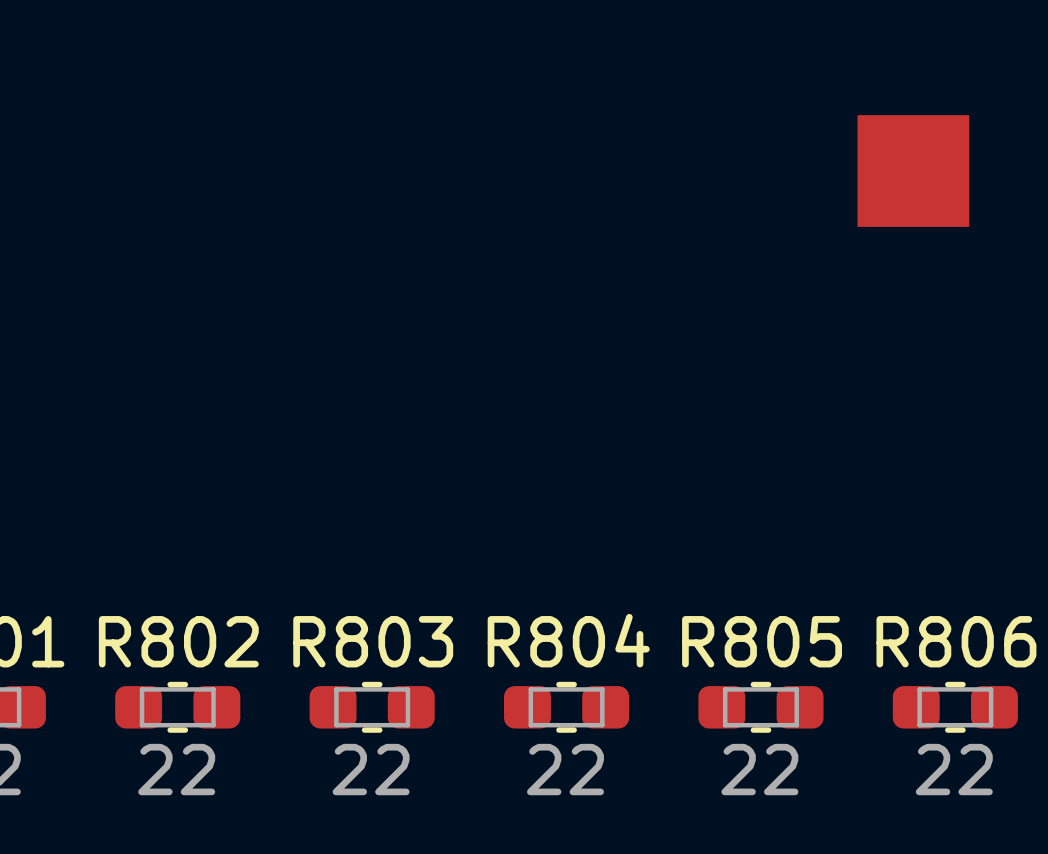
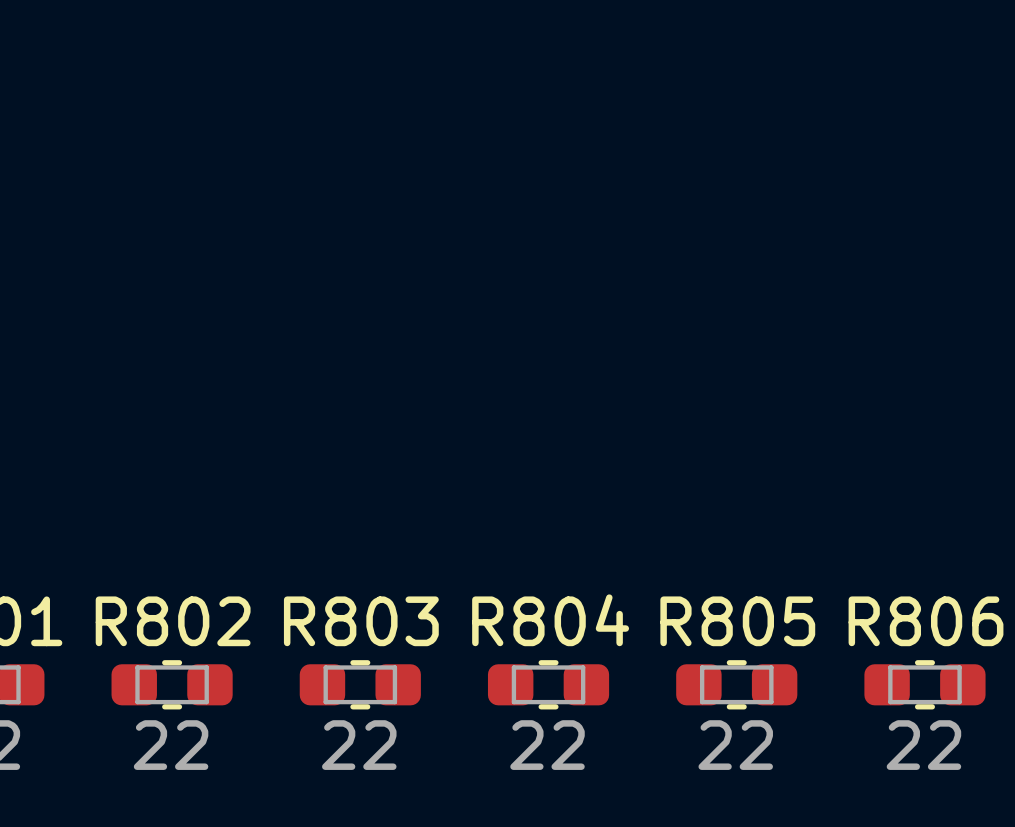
part: (913, 171) -> none

